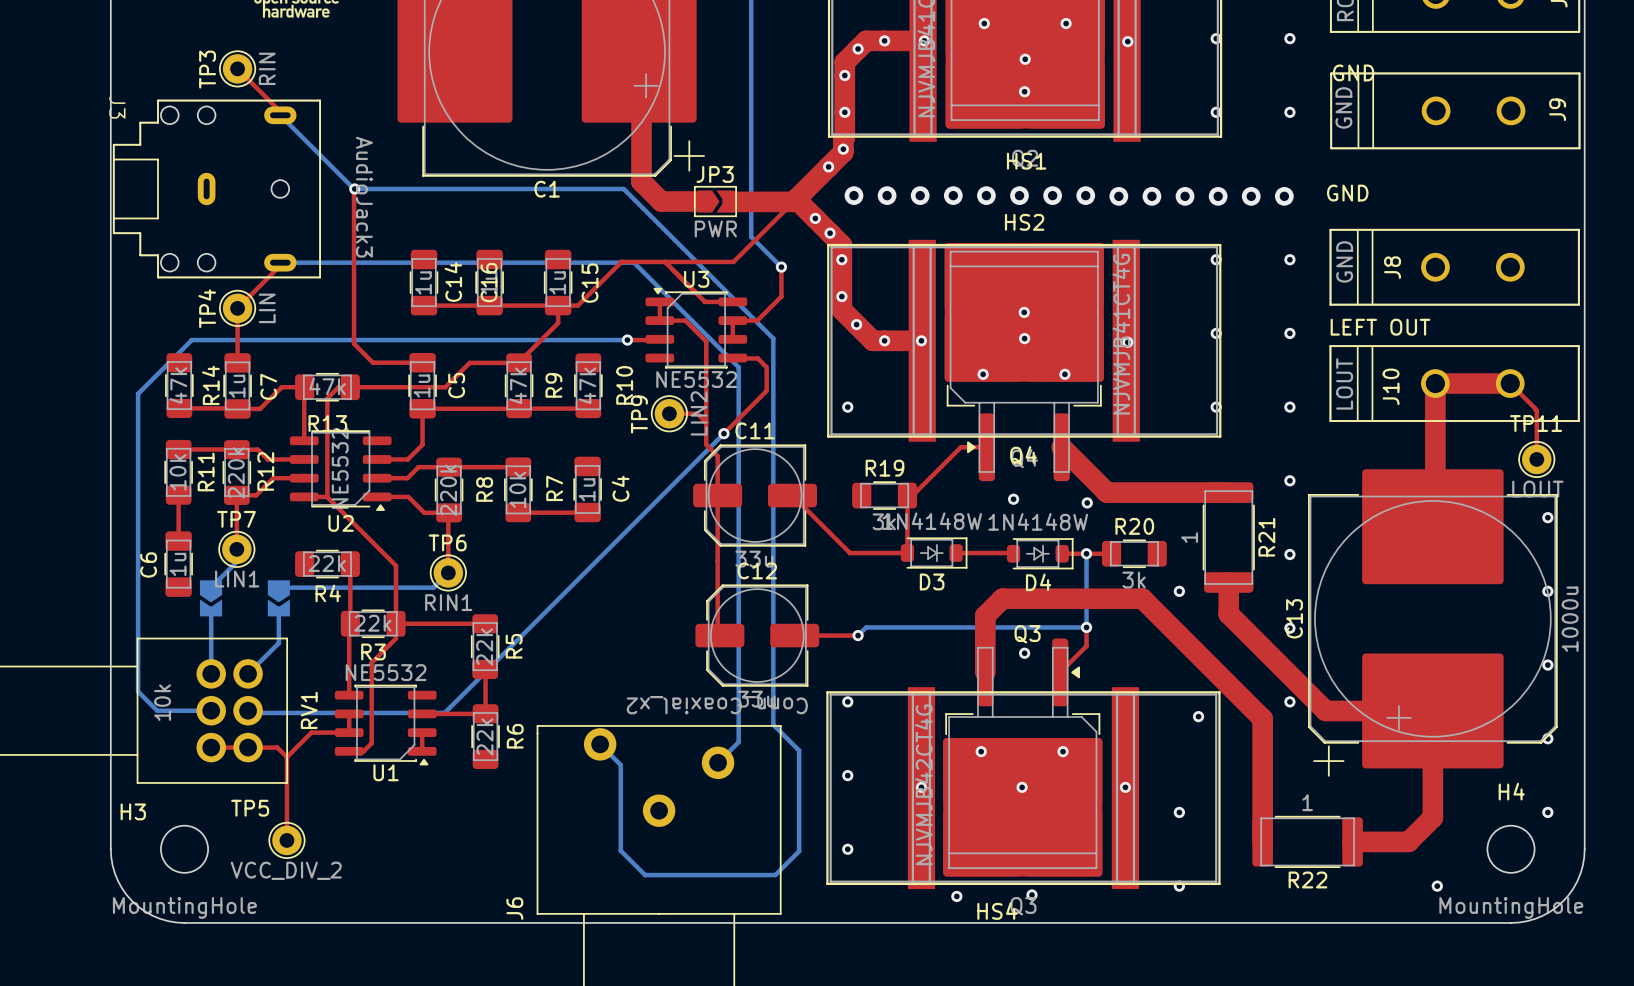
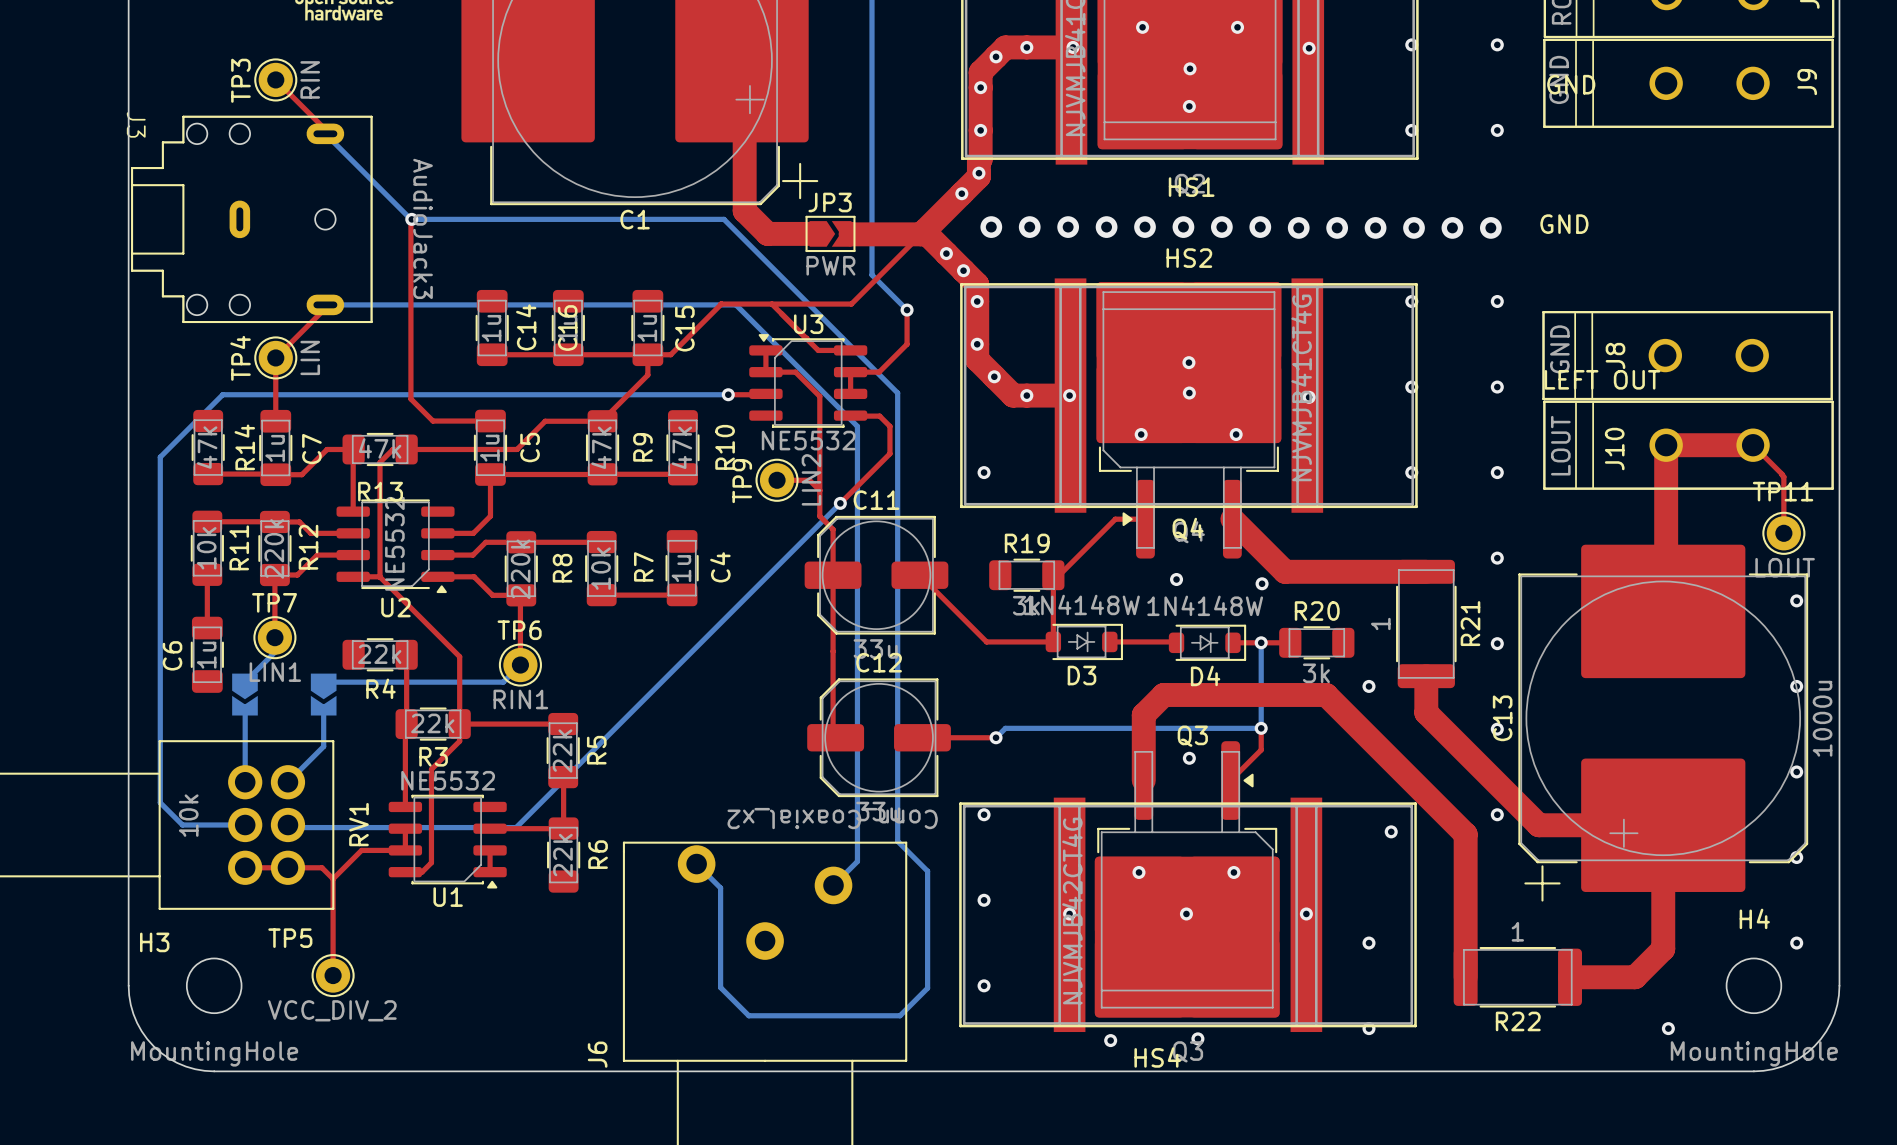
J9 position: (1455, 110) -> (1688, 83)
J8 position: (1454, 267) -> (1687, 355)

